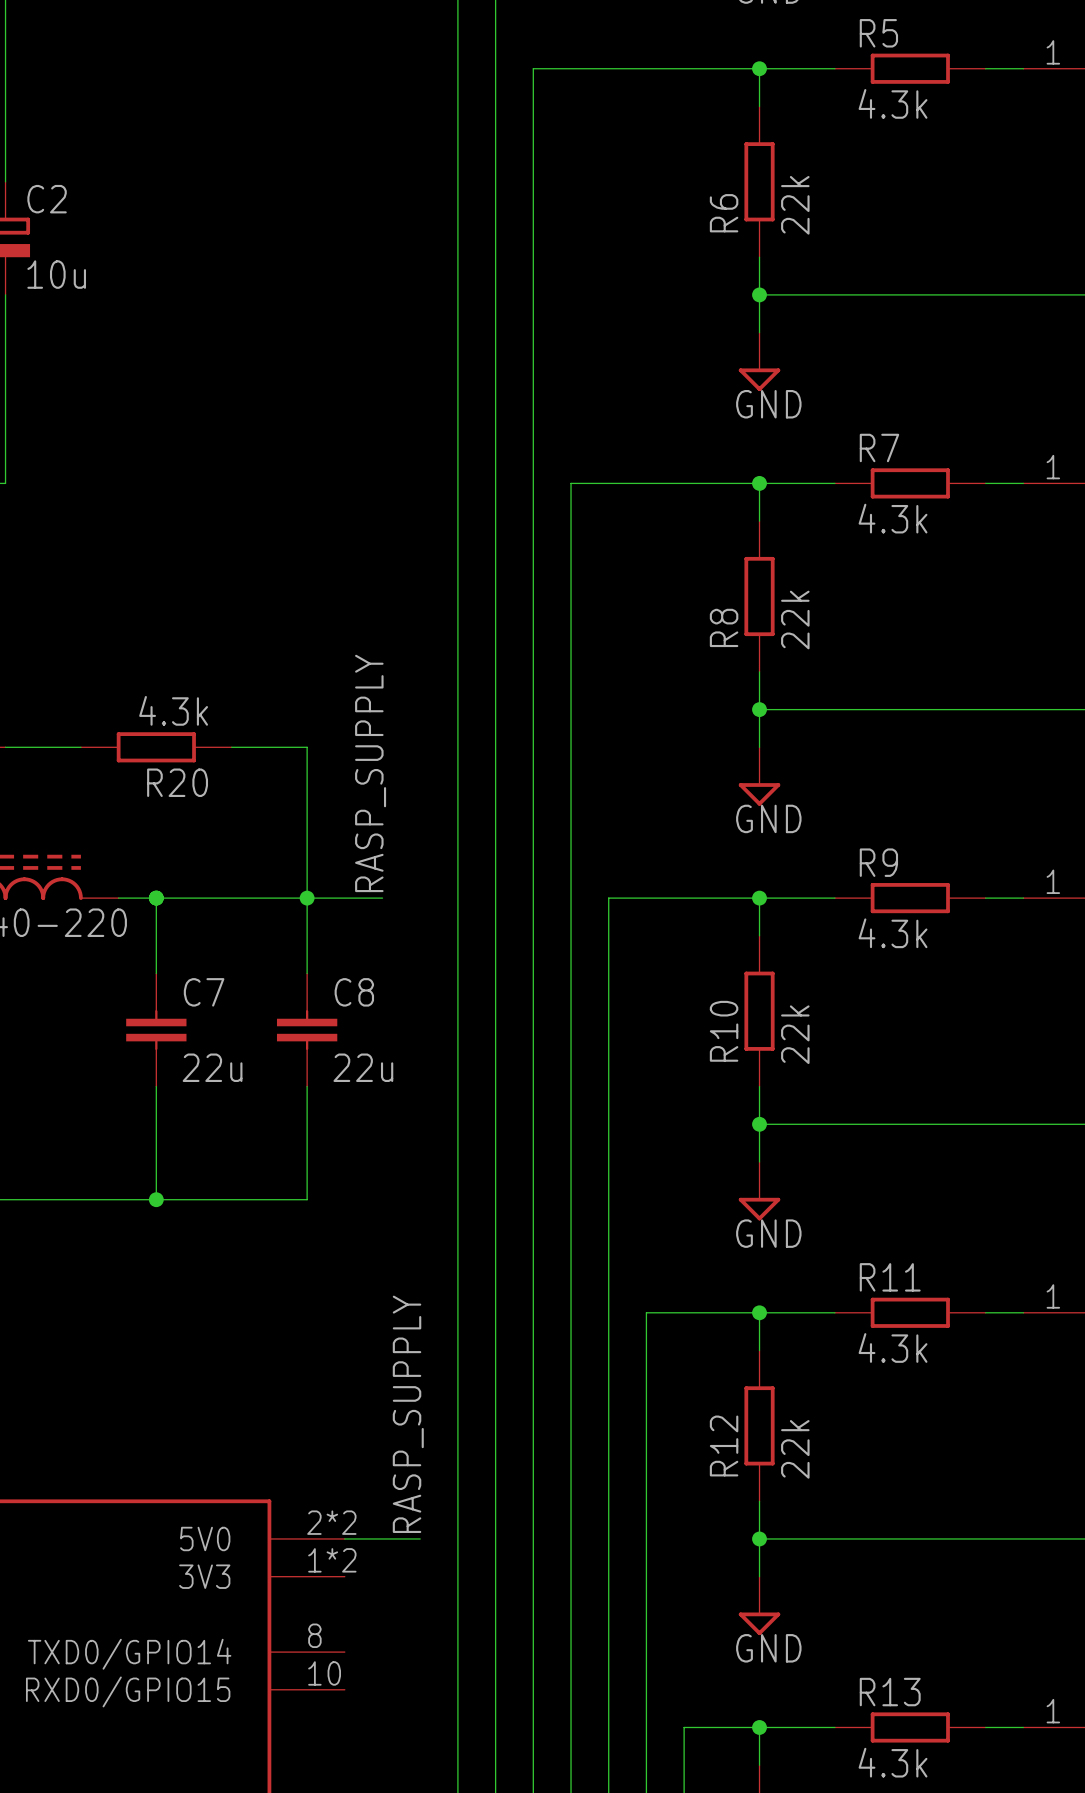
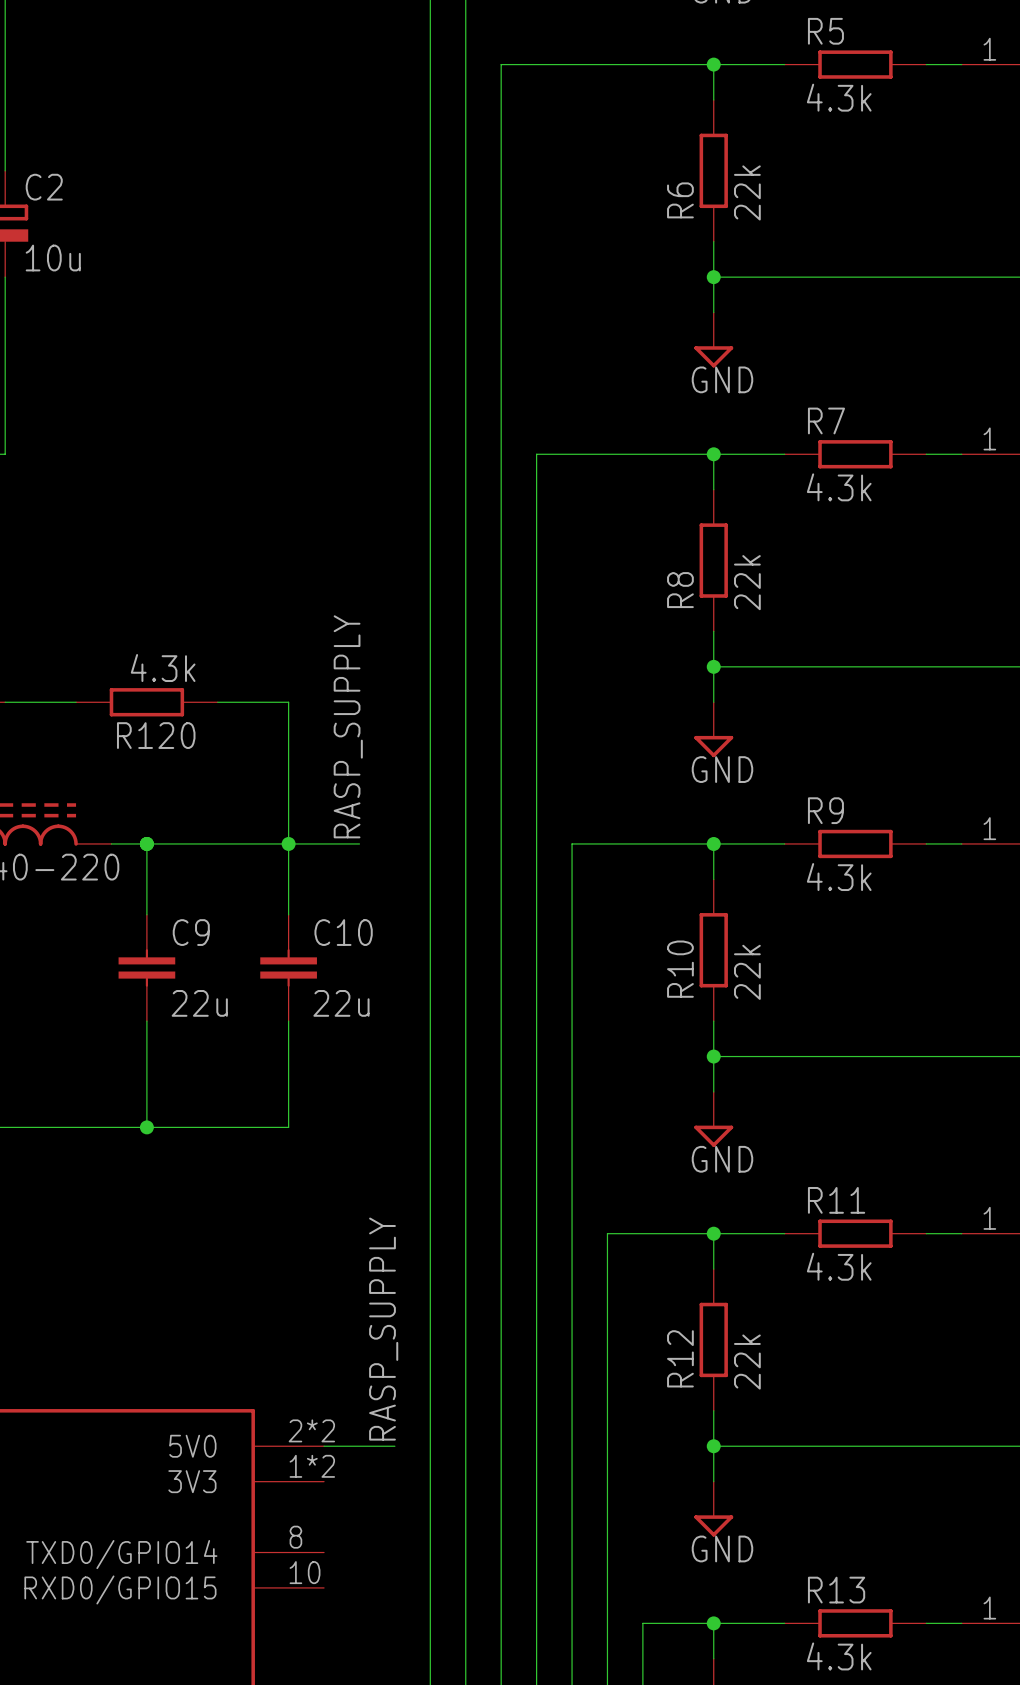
R20 name: R20 (177, 782) -> R120 (156, 735)
C7 name: C7 (204, 992) -> C9 (191, 932)
C8 name: C8 (354, 992) -> C10 (343, 932)

